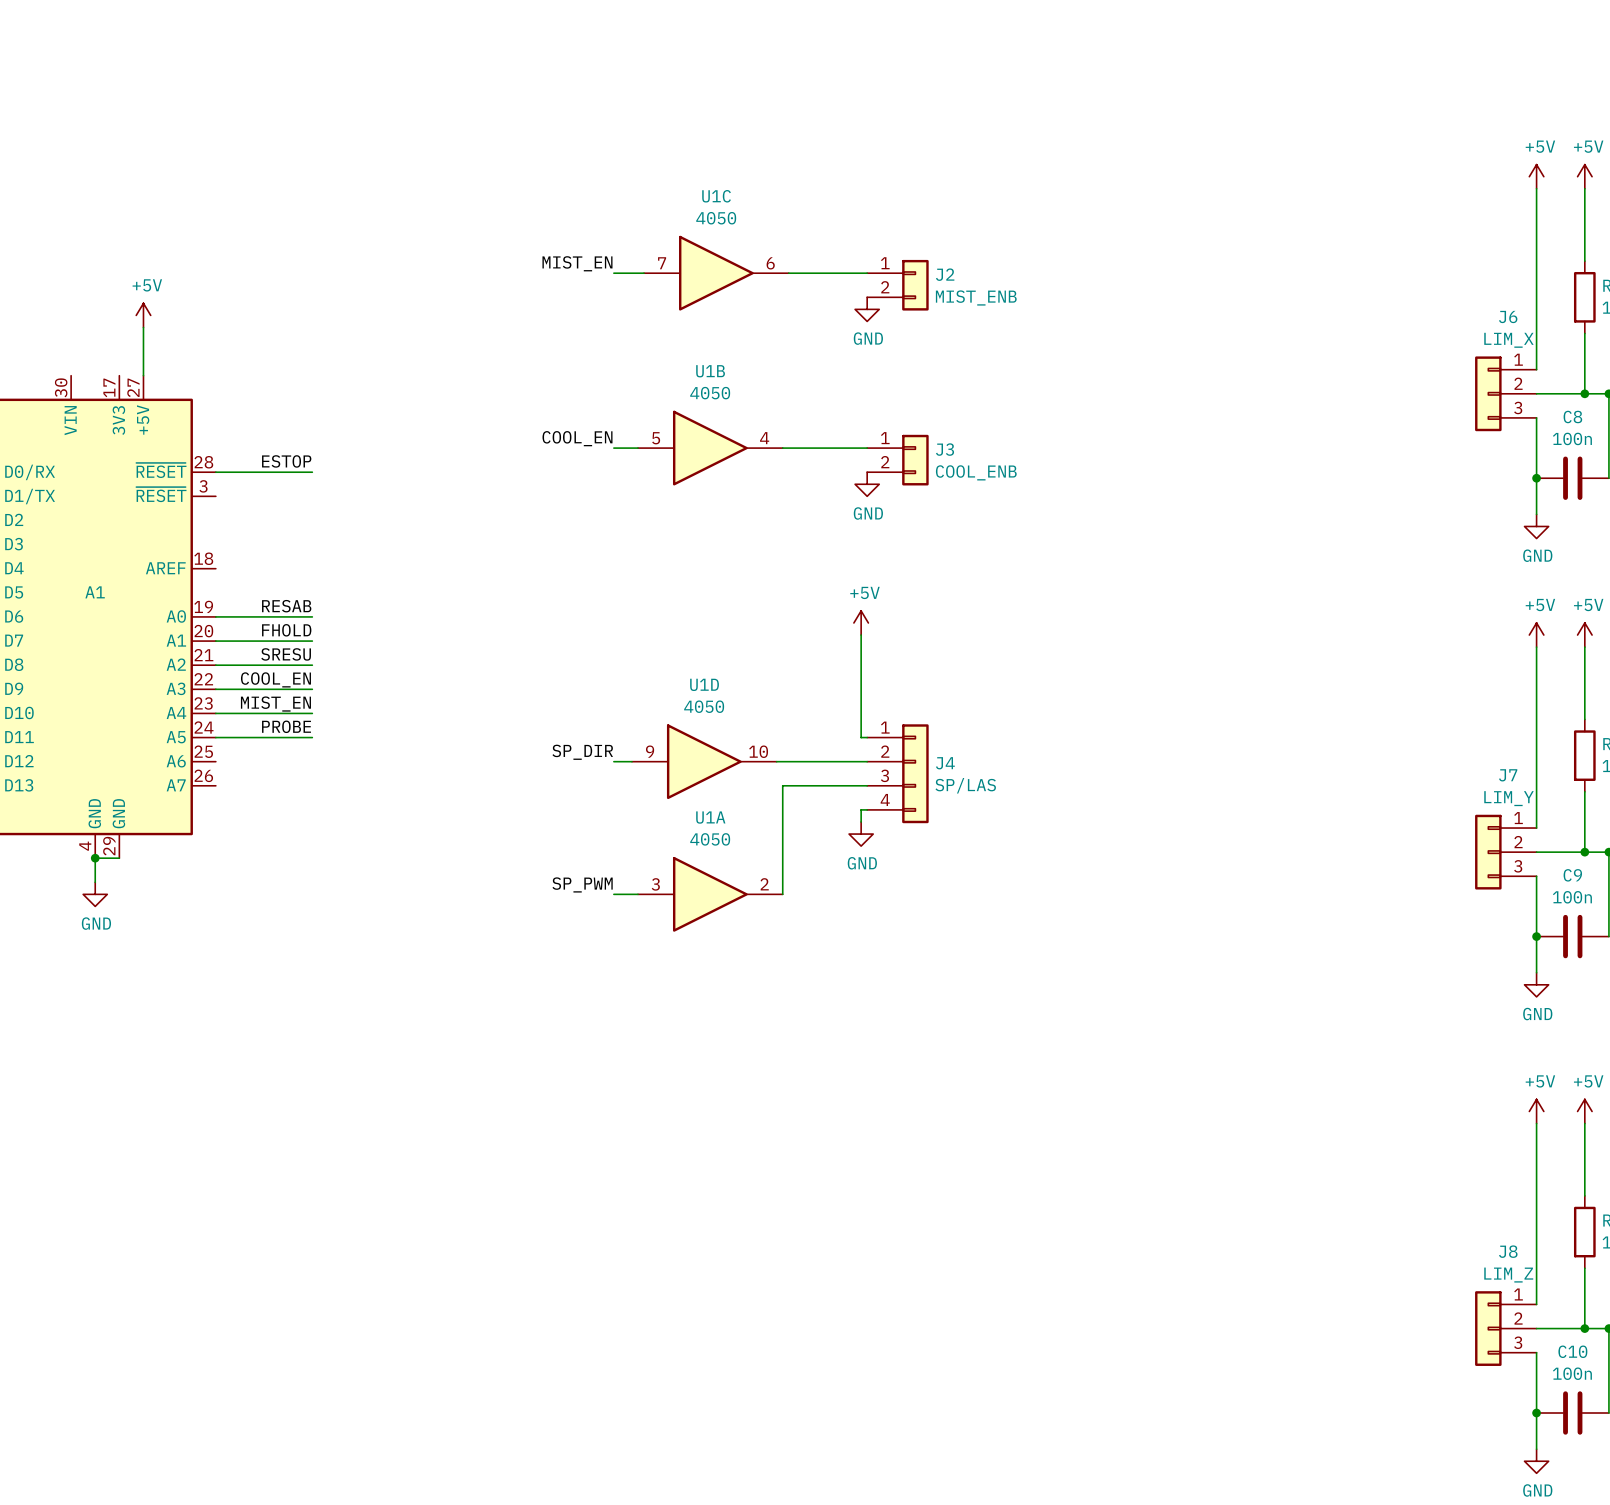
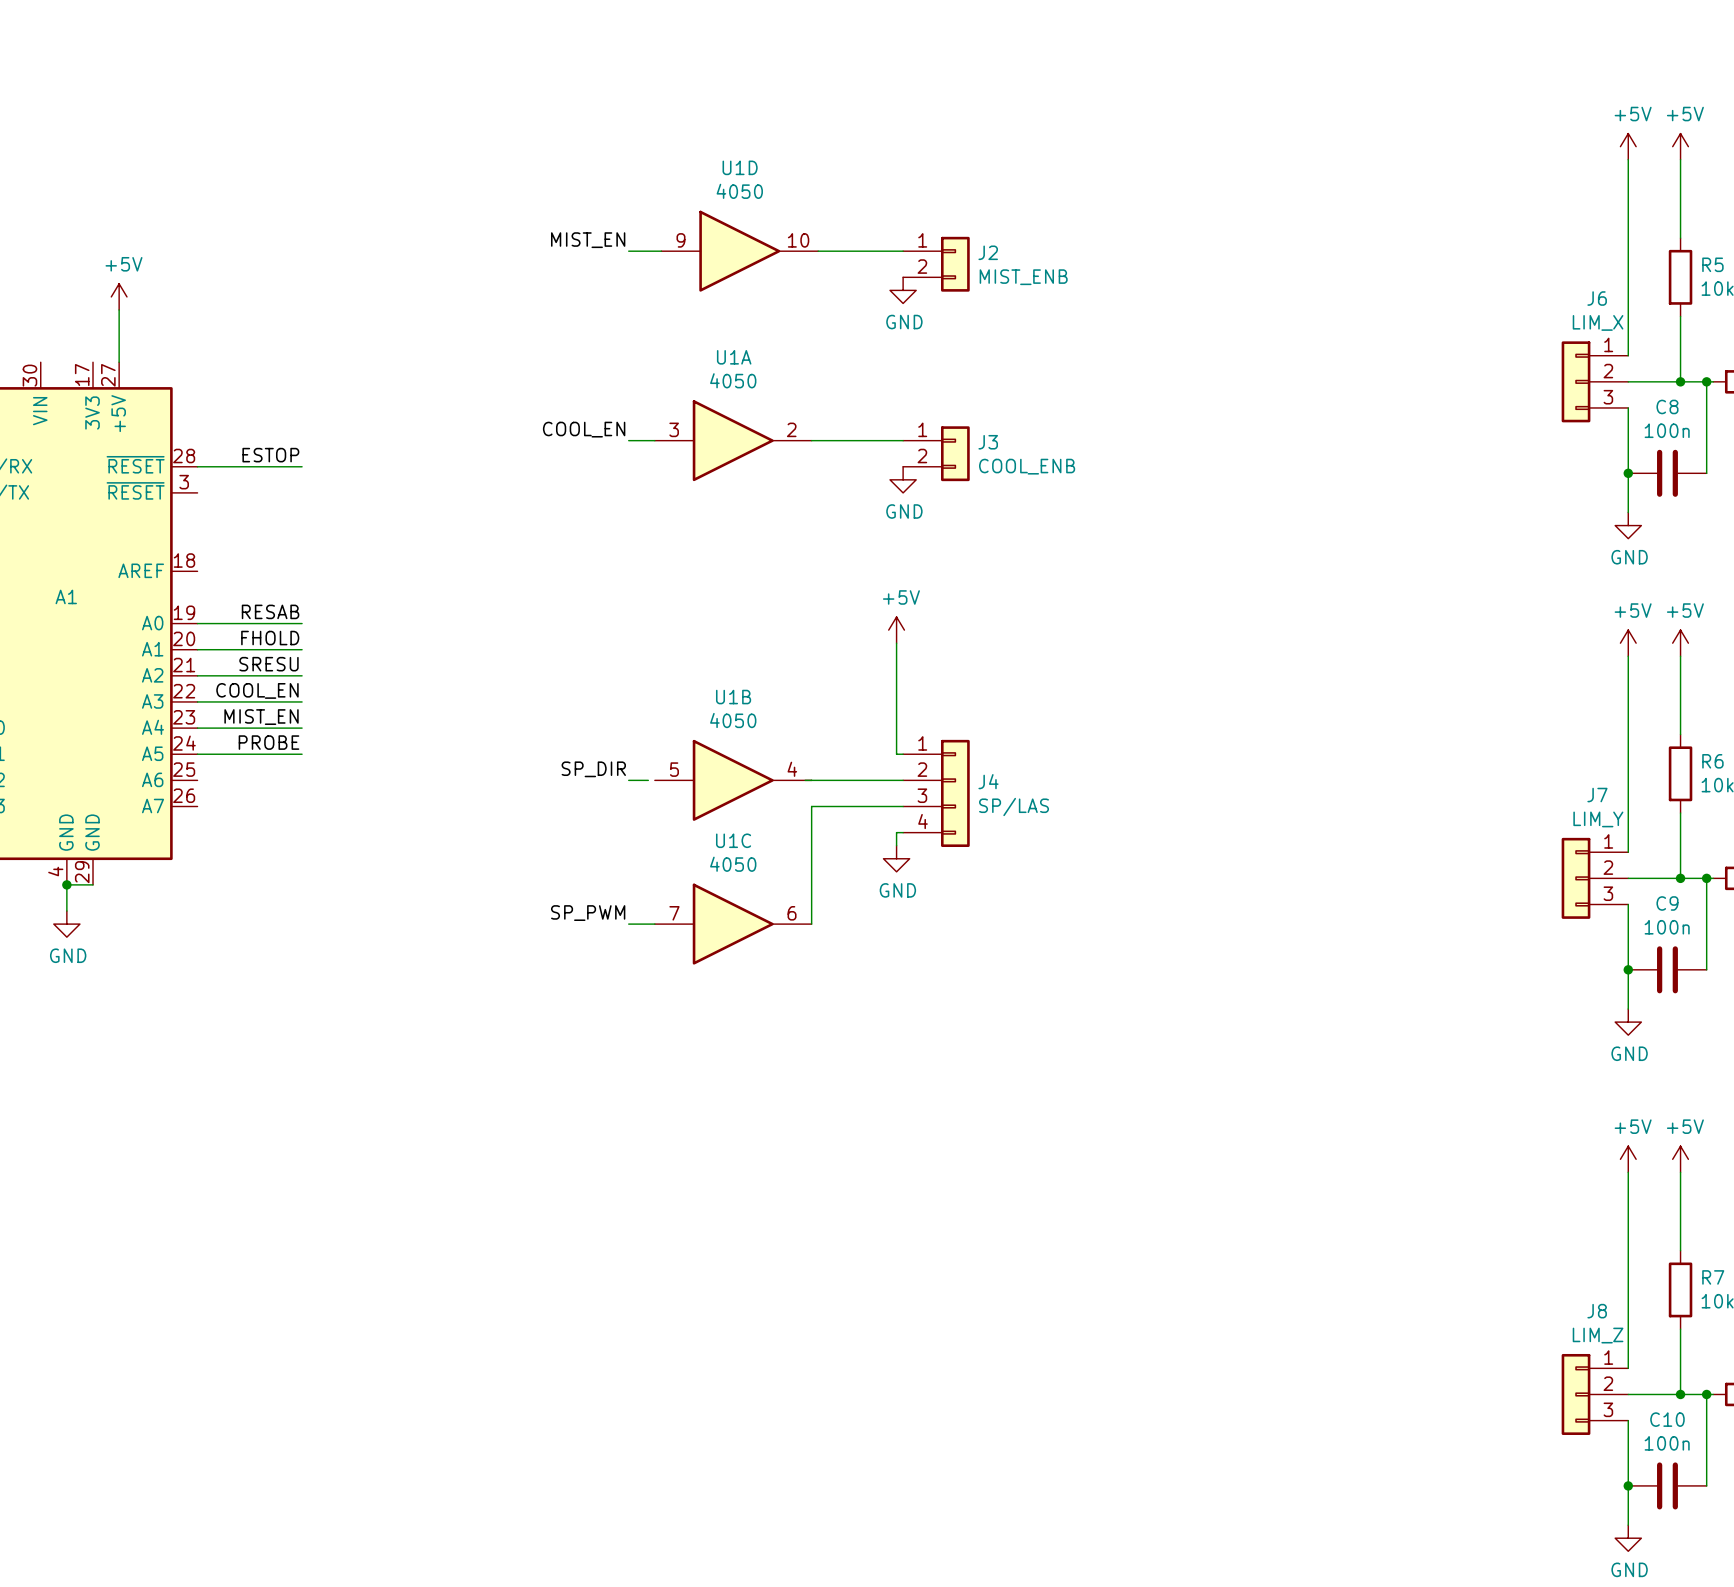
U1C position: (716, 273) -> (733, 924)
U1B position: (710, 448) -> (733, 780)
U1D position: (704, 761) -> (739, 251)
U1A position: (710, 894) -> (733, 440)

